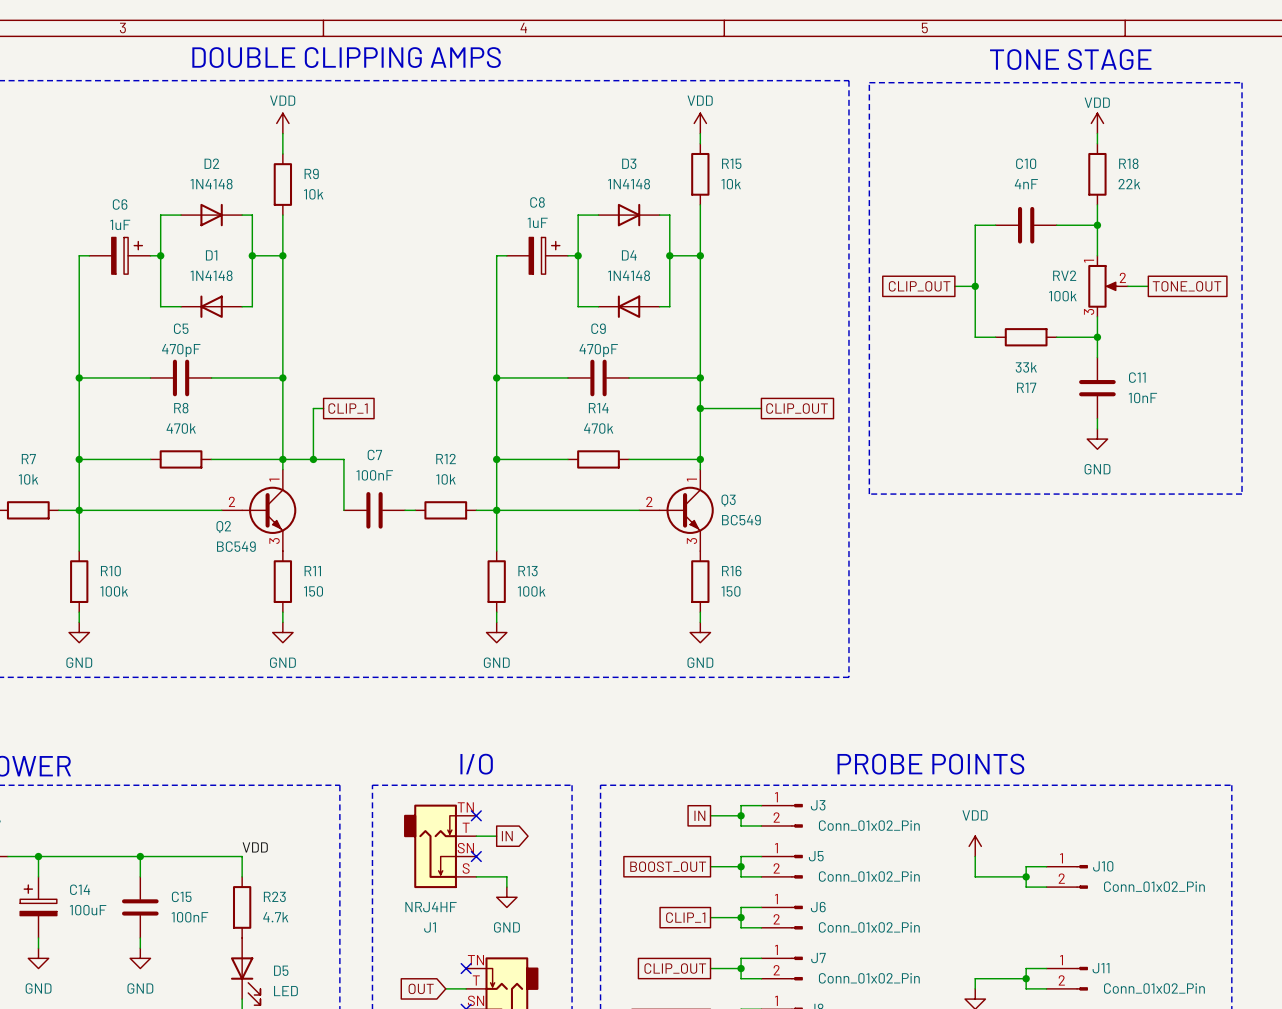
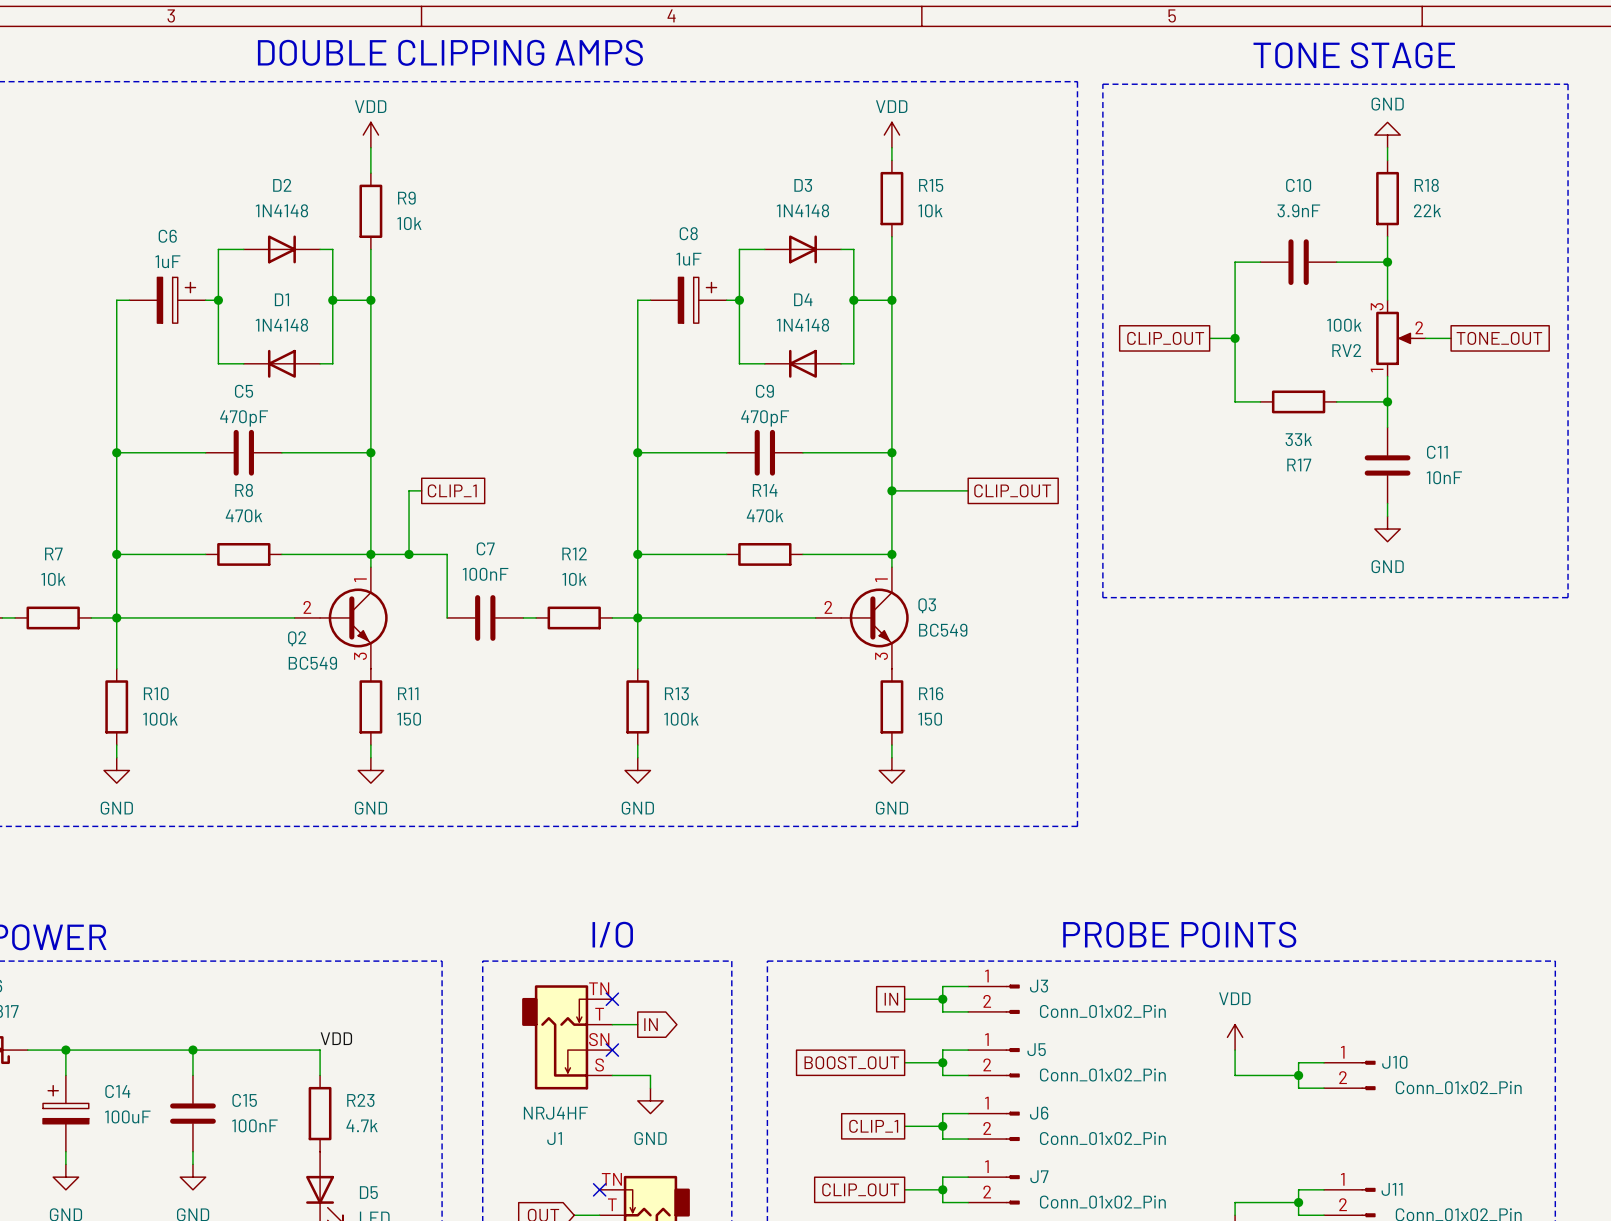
power symbol: VDD (1097, 123) -> GND (1387, 135)
C10 value: 4nF (1026, 184) -> 3.9nF (1298, 210)
RV2 flip: as is (1103, 286) -> up-down (1394, 338)

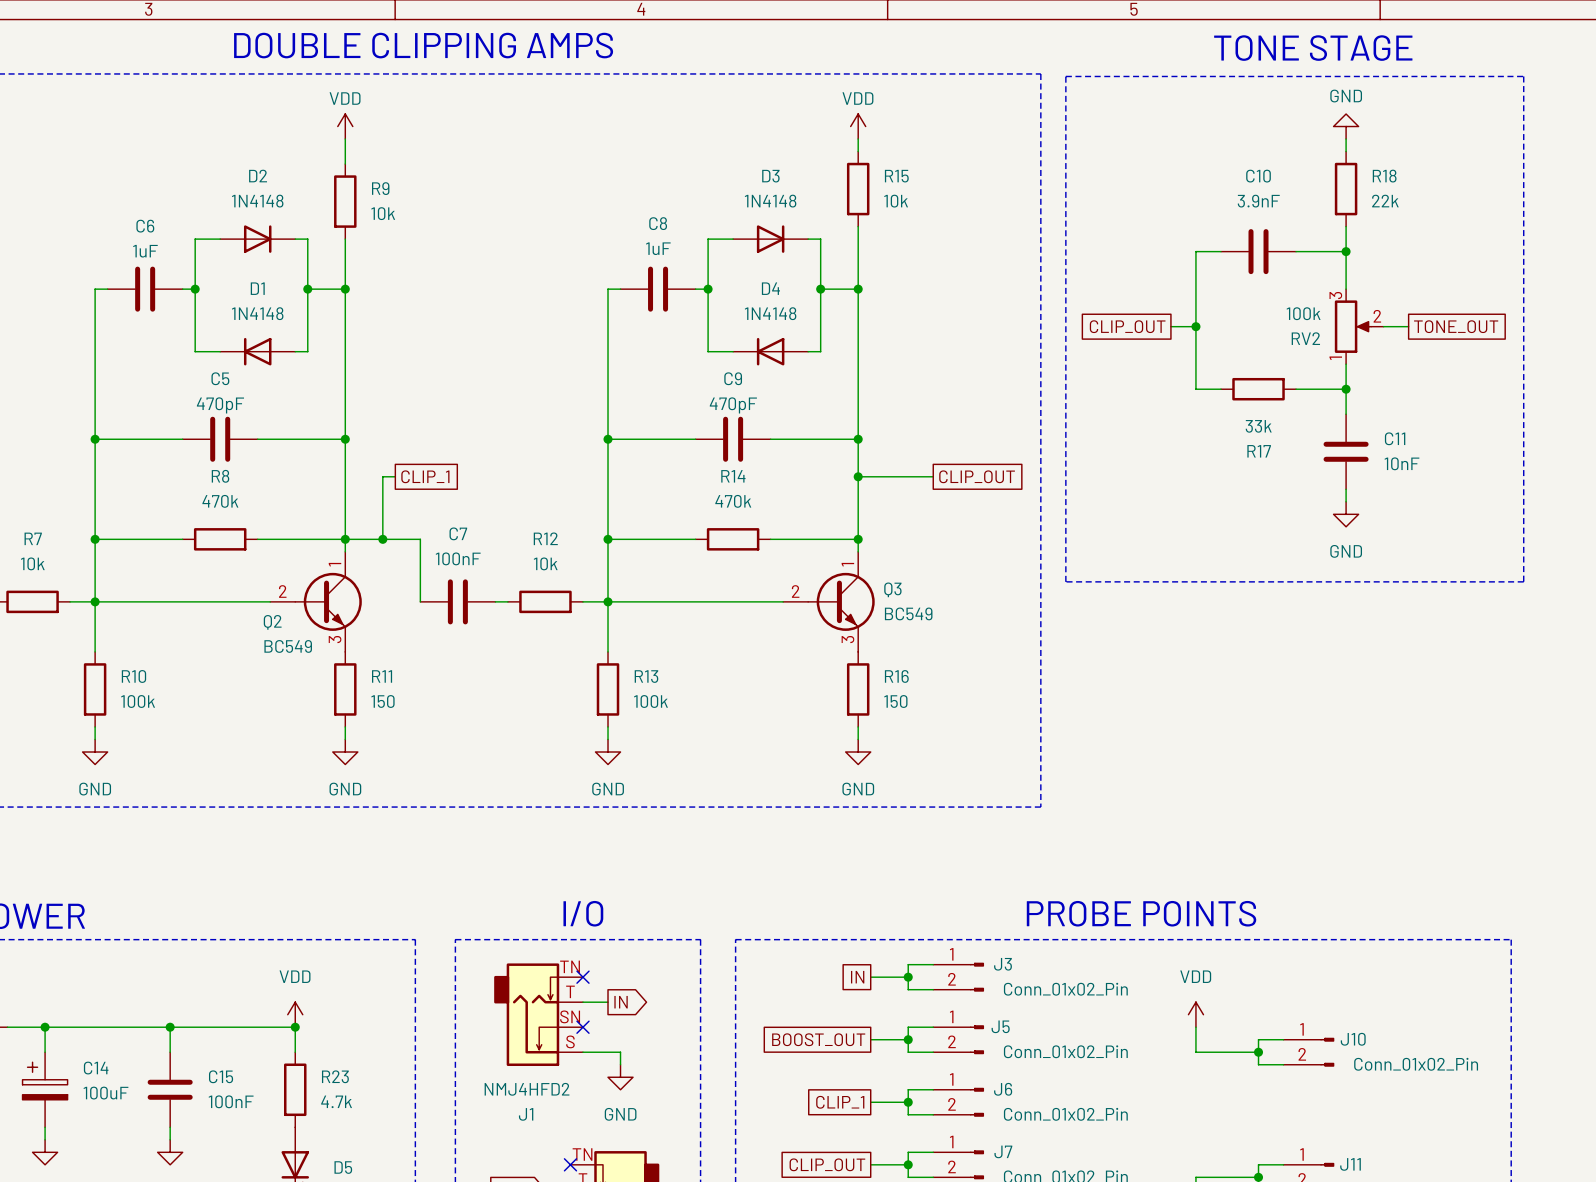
C6 symbol: [129, 277, 206, 324] -> [107, 266, 183, 312]
C8 symbol: [650, 277, 727, 324] -> [620, 266, 696, 312]
power symbol: none -> VDD (295, 1014)
label: VDD (336, 1038) -> none
junction: none -> (295, 1027)
J1 value: NRJ4HF (555, 1113) -> NMJ4HFD2 (527, 1089)

